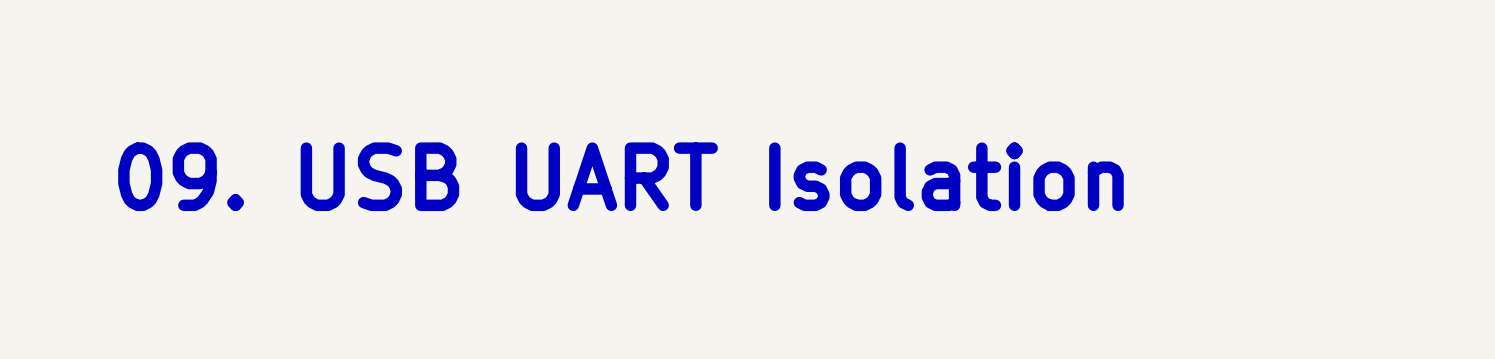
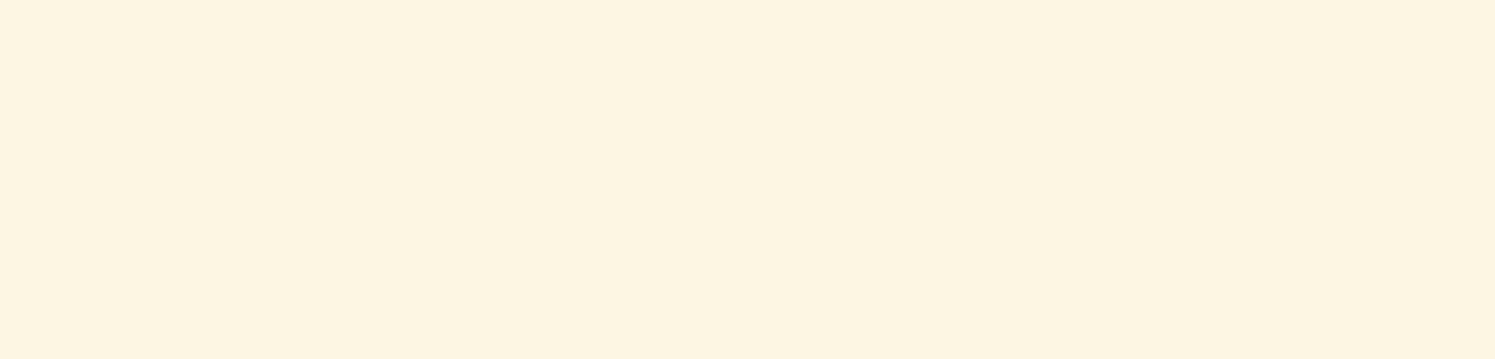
text: 09. USB UART Isolation (620, 176) -> none

